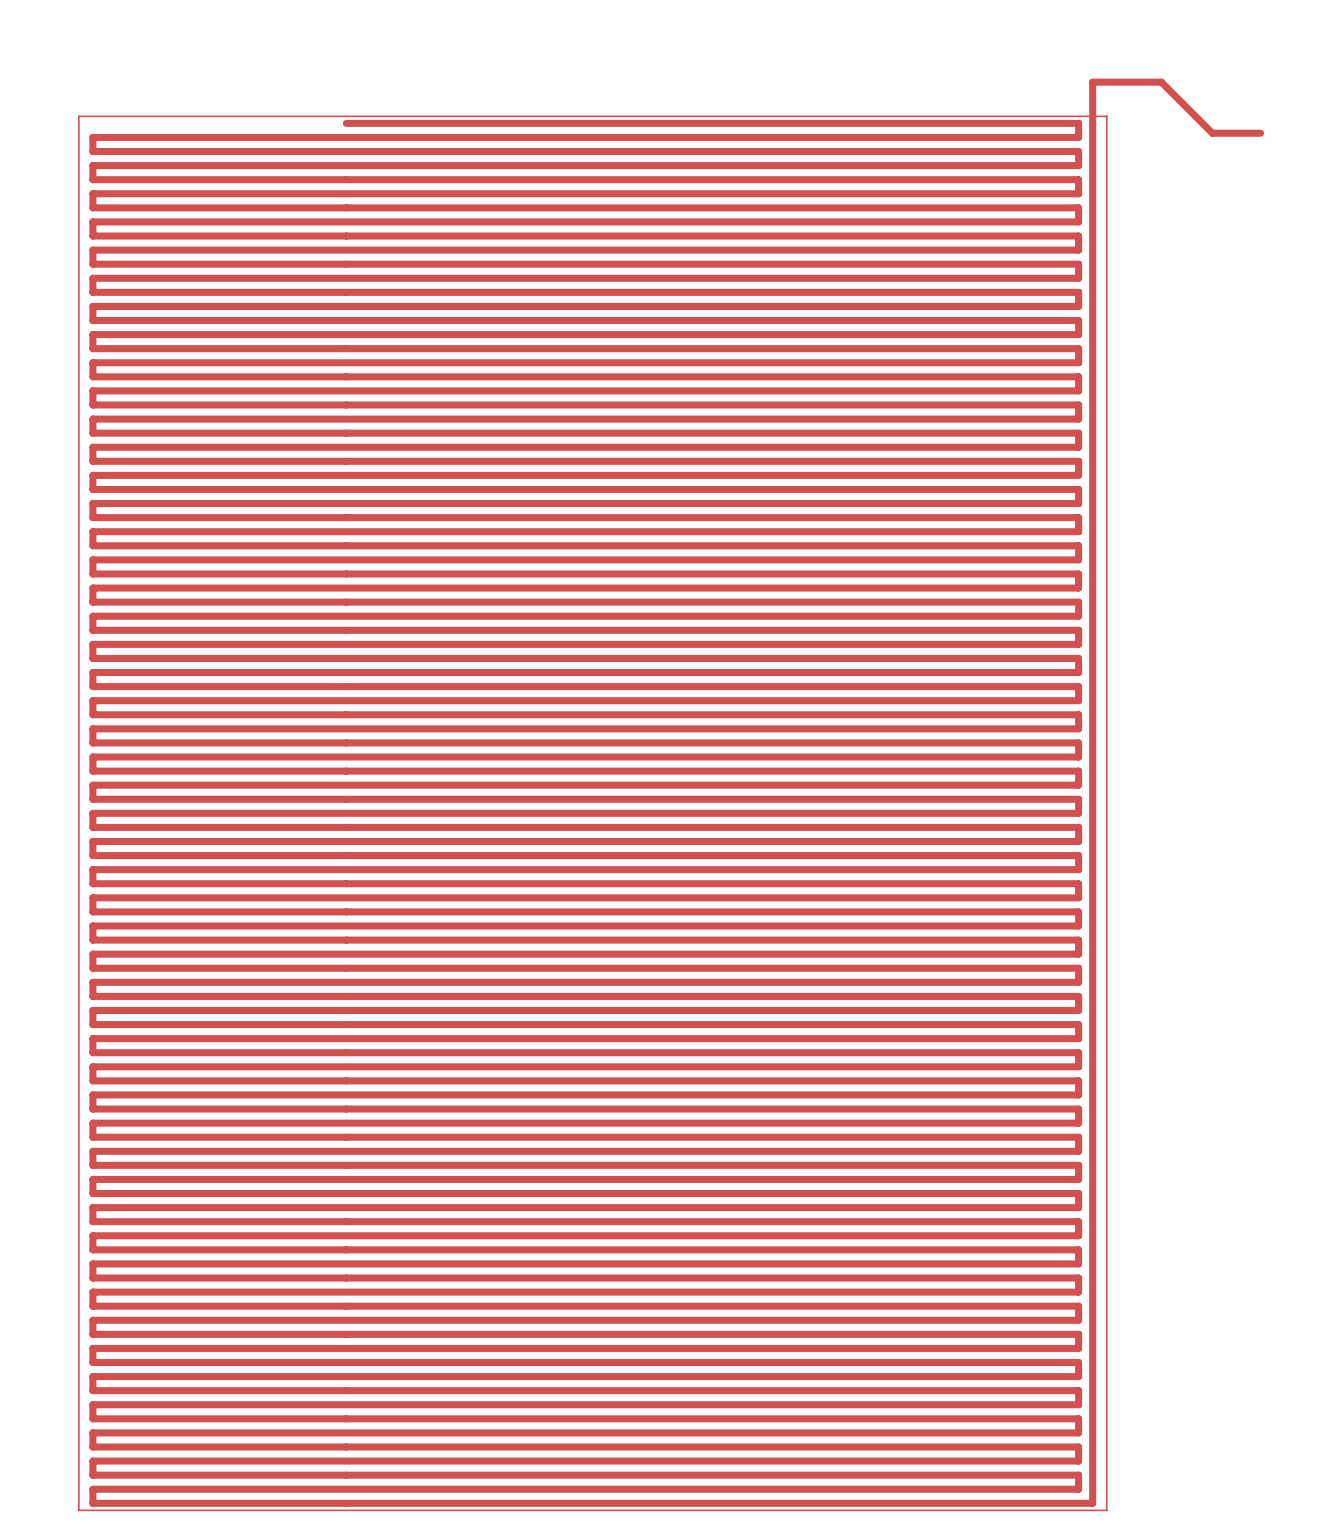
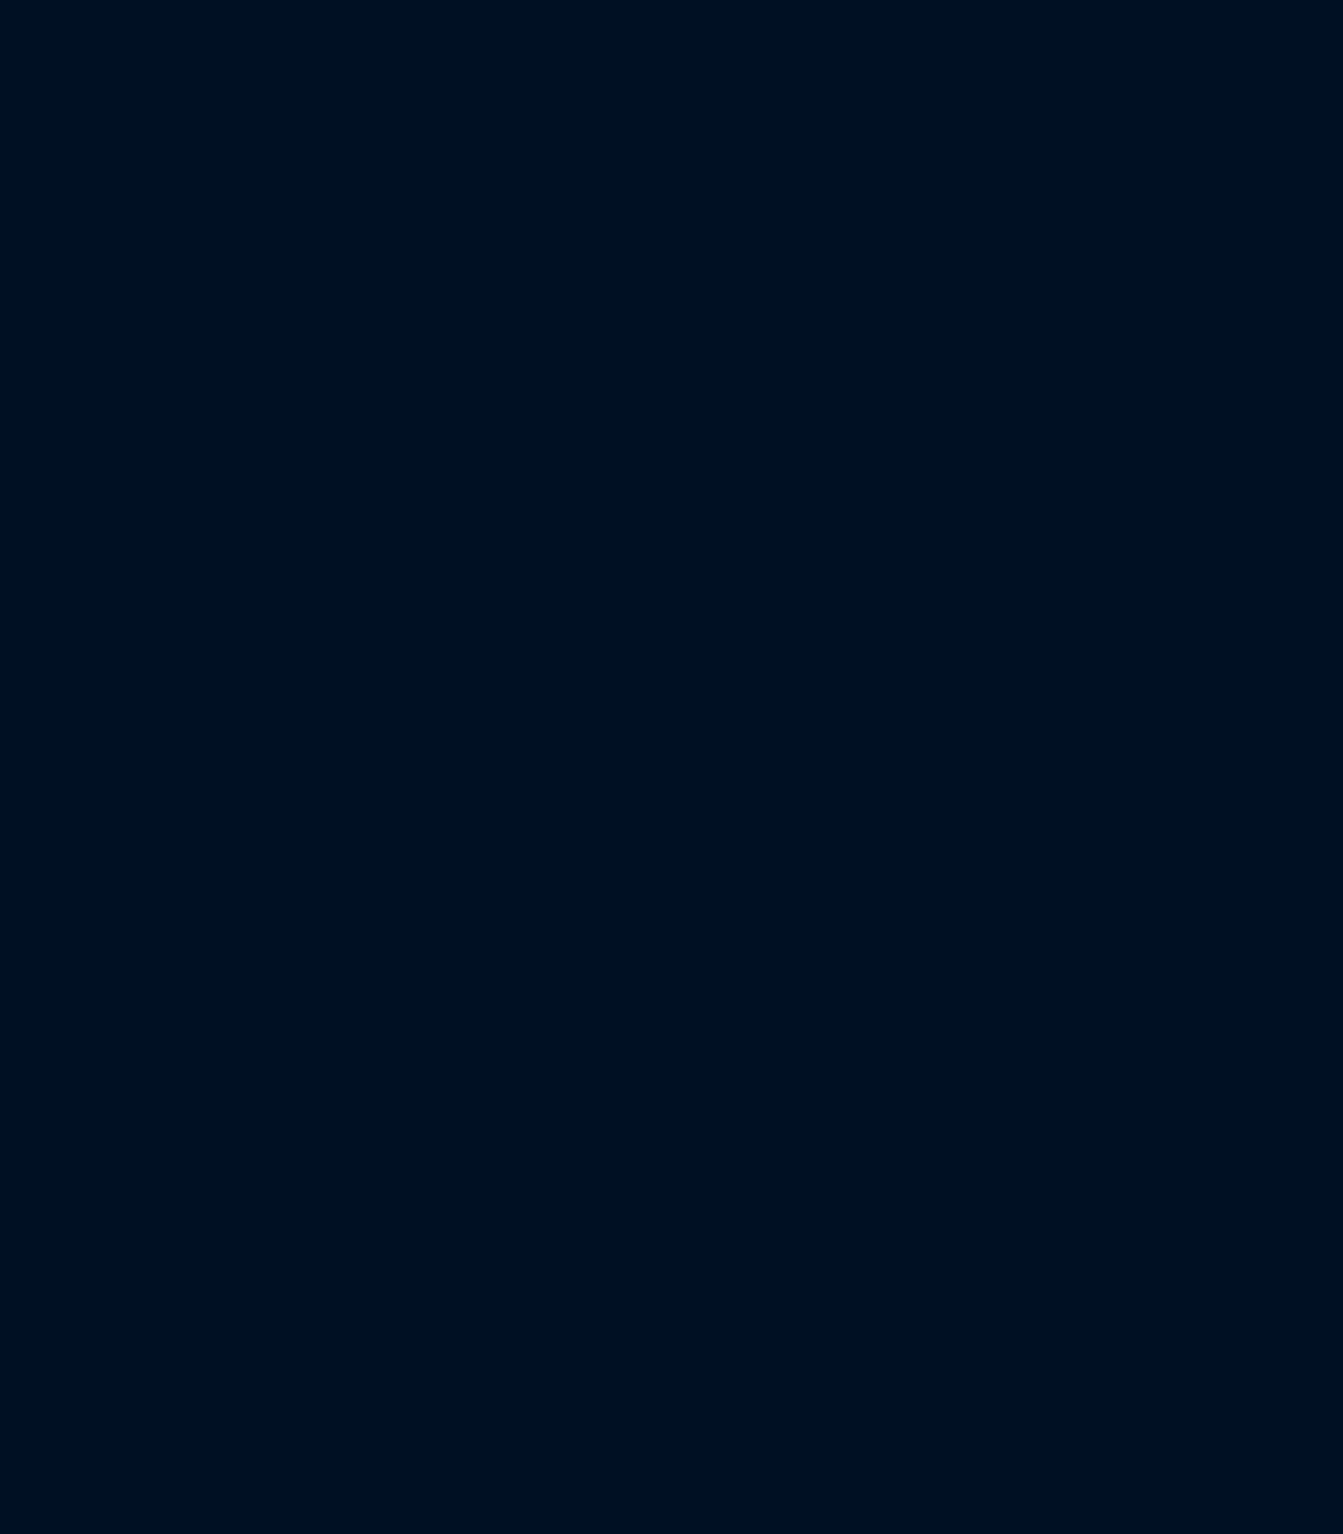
track: (78, 116) (78, 1510) (1106, 1510) (1106, 116) (78, 116) -> none
track: (346, 123) (1078, 123) (1078, 137) (92, 137) (92, 151) (1078, 151) (1078, 165) (92, 165) (92, 179) (1078, 179) (1078, 193) (92, 193) (92, 207) (1078, 207) (1078, 221) (92, 221) (92, 236) (1078, 236) (1078, 250) (92, 250) (92, 264) (1078, 264) (1078, 278) (92, 278) (92, 292) (1078, 292) (1078, 306) (92, 306) (92, 320) (1078, 320) (1078, 334) (92, 334) (92, 348) (1078, 348) (1078, 362) (92, 362) (92, 376) (1078, 376) (1078, 390) (92, 390) (92, 404) (1078, 404) (1078, 419) (92, 419) (92, 433) (1078, 433) (1078, 447) (92, 447) (92, 461) (1078, 461) (1078, 475) (92, 475) (92, 489) (1078, 489) (1078, 503) (92, 503) (92, 517) (1078, 517) (1078, 531) (92, 531) (92, 545) (1078, 545) (1078, 559) (92, 559) (92, 573) (1078, 573) (1078, 588) (92, 588) (92, 602) (1078, 602) (1078, 616) (92, 616) (92, 630) (1078, 630) (1078, 644) (92, 644) (92, 658) (1078, 658) (1078, 672) (92, 672) (92, 686) (1078, 686) (1078, 700) (92, 700) (92, 714) (1078, 714) (1078, 728) (92, 728) (92, 742) (1078, 742) (1078, 757) (92, 757) (92, 771) (1078, 771) (1078, 785) (92, 785) (92, 799) (1078, 799) (1078, 813) (92, 813) (92, 827) (1078, 827) (1078, 841) (92, 841) (92, 855) (1078, 855) (1078, 869) (92, 869) (92, 883) (1078, 883) (1078, 897) (92, 897) (92, 911) (1078, 911) (1078, 925) (92, 925) (92, 940) (1078, 940) (1078, 954) (92, 954) (92, 968) (1078, 968) (1078, 982) (92, 982) (92, 996) (1078, 996) (1078, 1010) (92, 1010) (92, 1024) (1078, 1024) (1078, 1038) (92, 1038) (92, 1052) (1078, 1052) (1078, 1066) (92, 1066) (92, 1080) (1078, 1080) (1078, 1094) (92, 1094) (92, 1109) (1078, 1109) (1078, 1123) (92, 1123) (92, 1137) (1078, 1137) (1078, 1151) (92, 1151) (92, 1165) (1078, 1165) (1078, 1179) (92, 1179) (92, 1193) (1078, 1193) (1078, 1207) (92, 1207) (92, 1221) (1078, 1221) (1078, 1235) (92, 1235) (92, 1249) (1078, 1249) (1078, 1263) (92, 1263) (92, 1278) (1078, 1278) (1078, 1292) (92, 1292) (92, 1306) (1078, 1306) (1078, 1320) (92, 1320) (92, 1334) (1078, 1334) (1078, 1348) (92, 1348) (92, 1362) (1078, 1362) (1078, 1376) (92, 1376) (92, 1390) (1078, 1390) (1078, 1404) (92, 1404) (92, 1418) (1078, 1418) (1078, 1432) (92, 1432) (92, 1447) (1078, 1447) (1078, 1461) (92, 1461) (92, 1475) (1078, 1475) (1078, 1489) (92, 1489) (92, 1503) (1092, 1503) (1092, 82) (1161, 82) (1212, 133) (1260, 133) -> none

